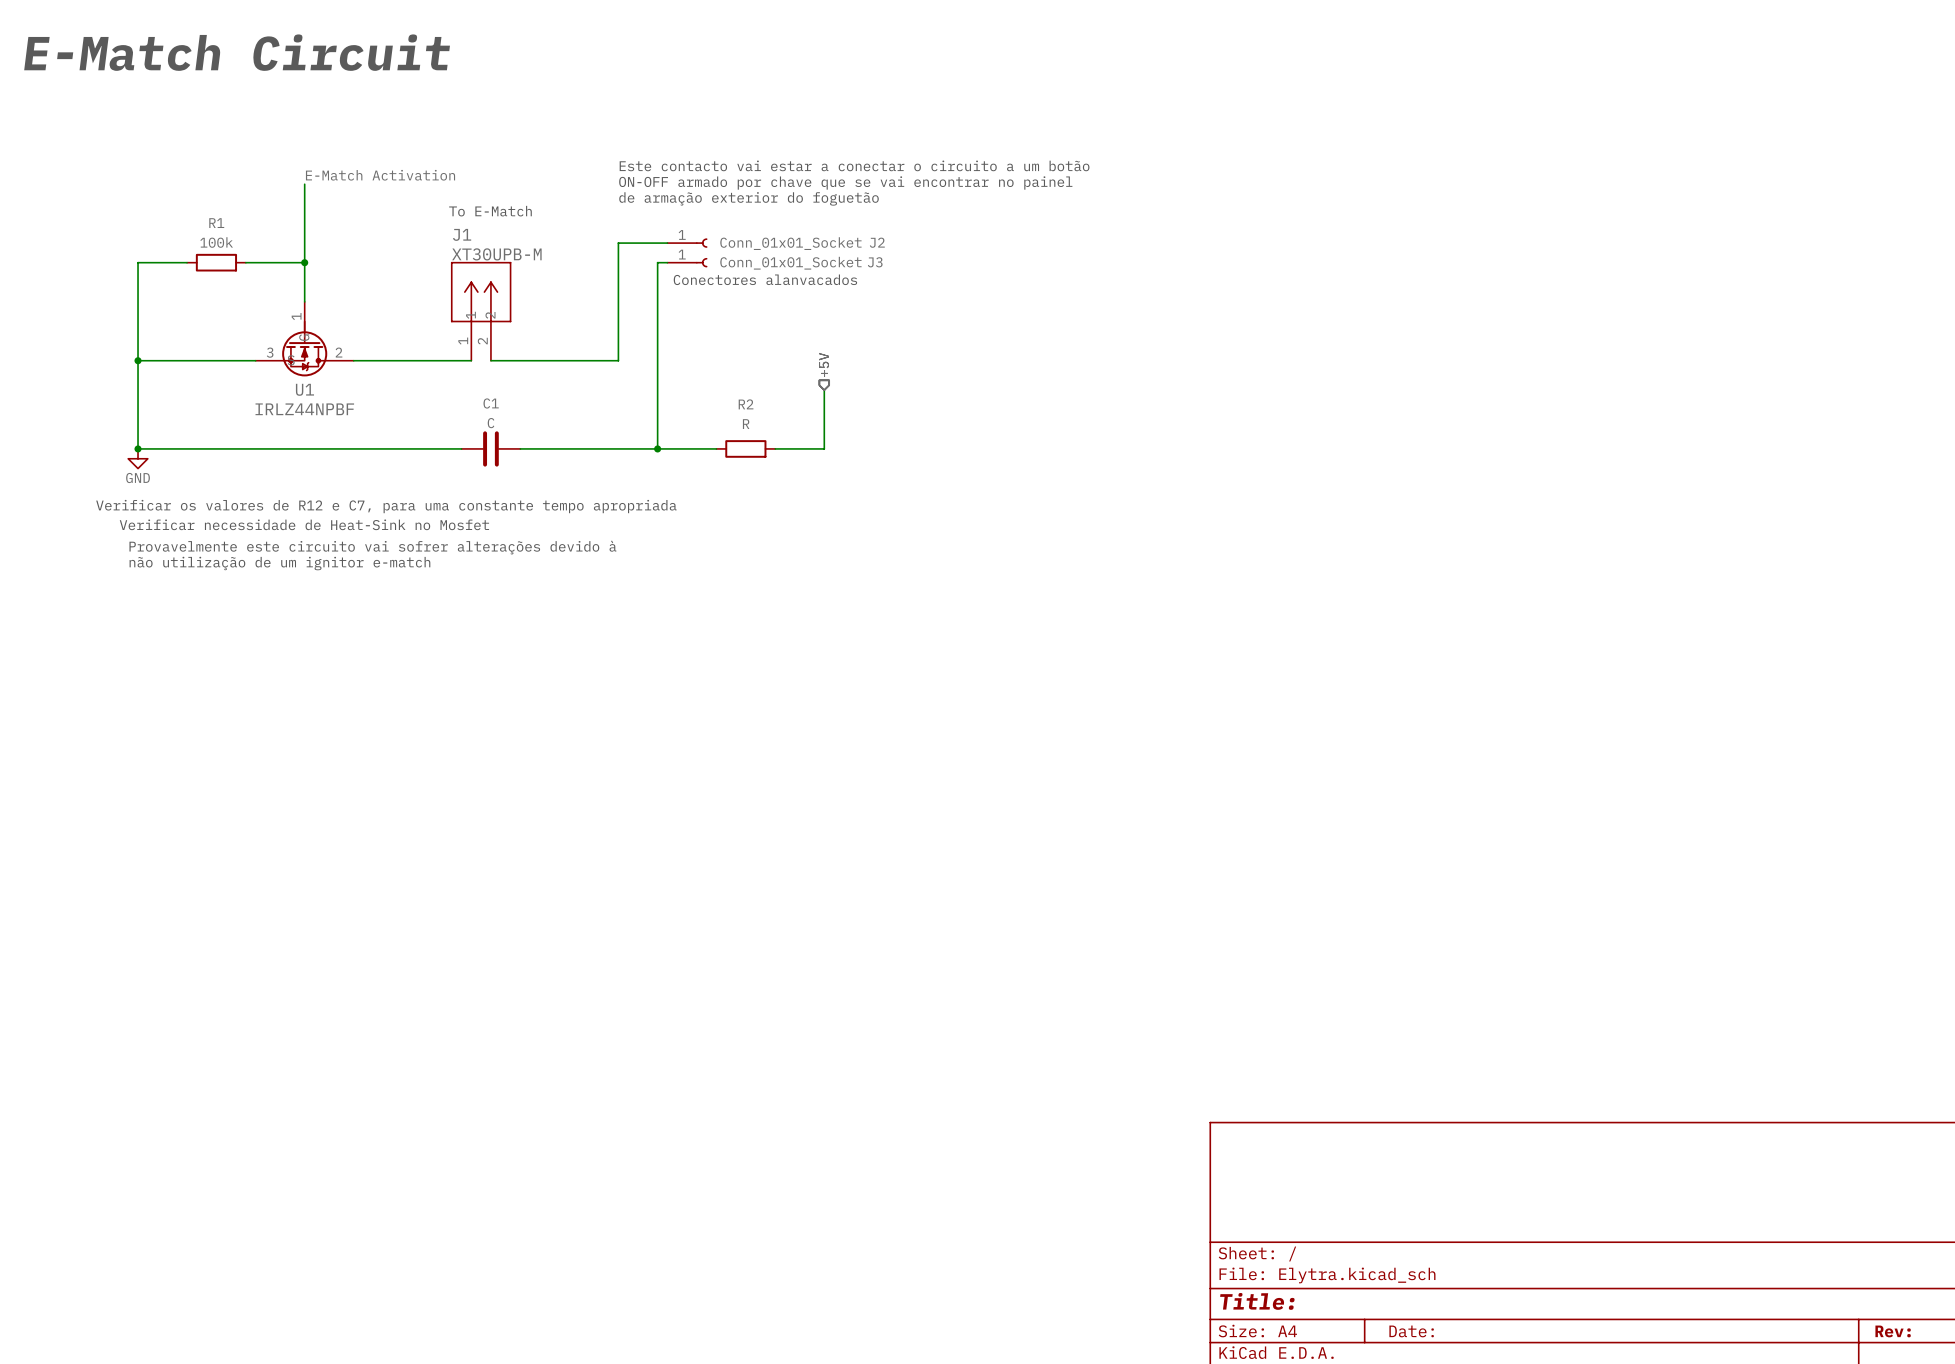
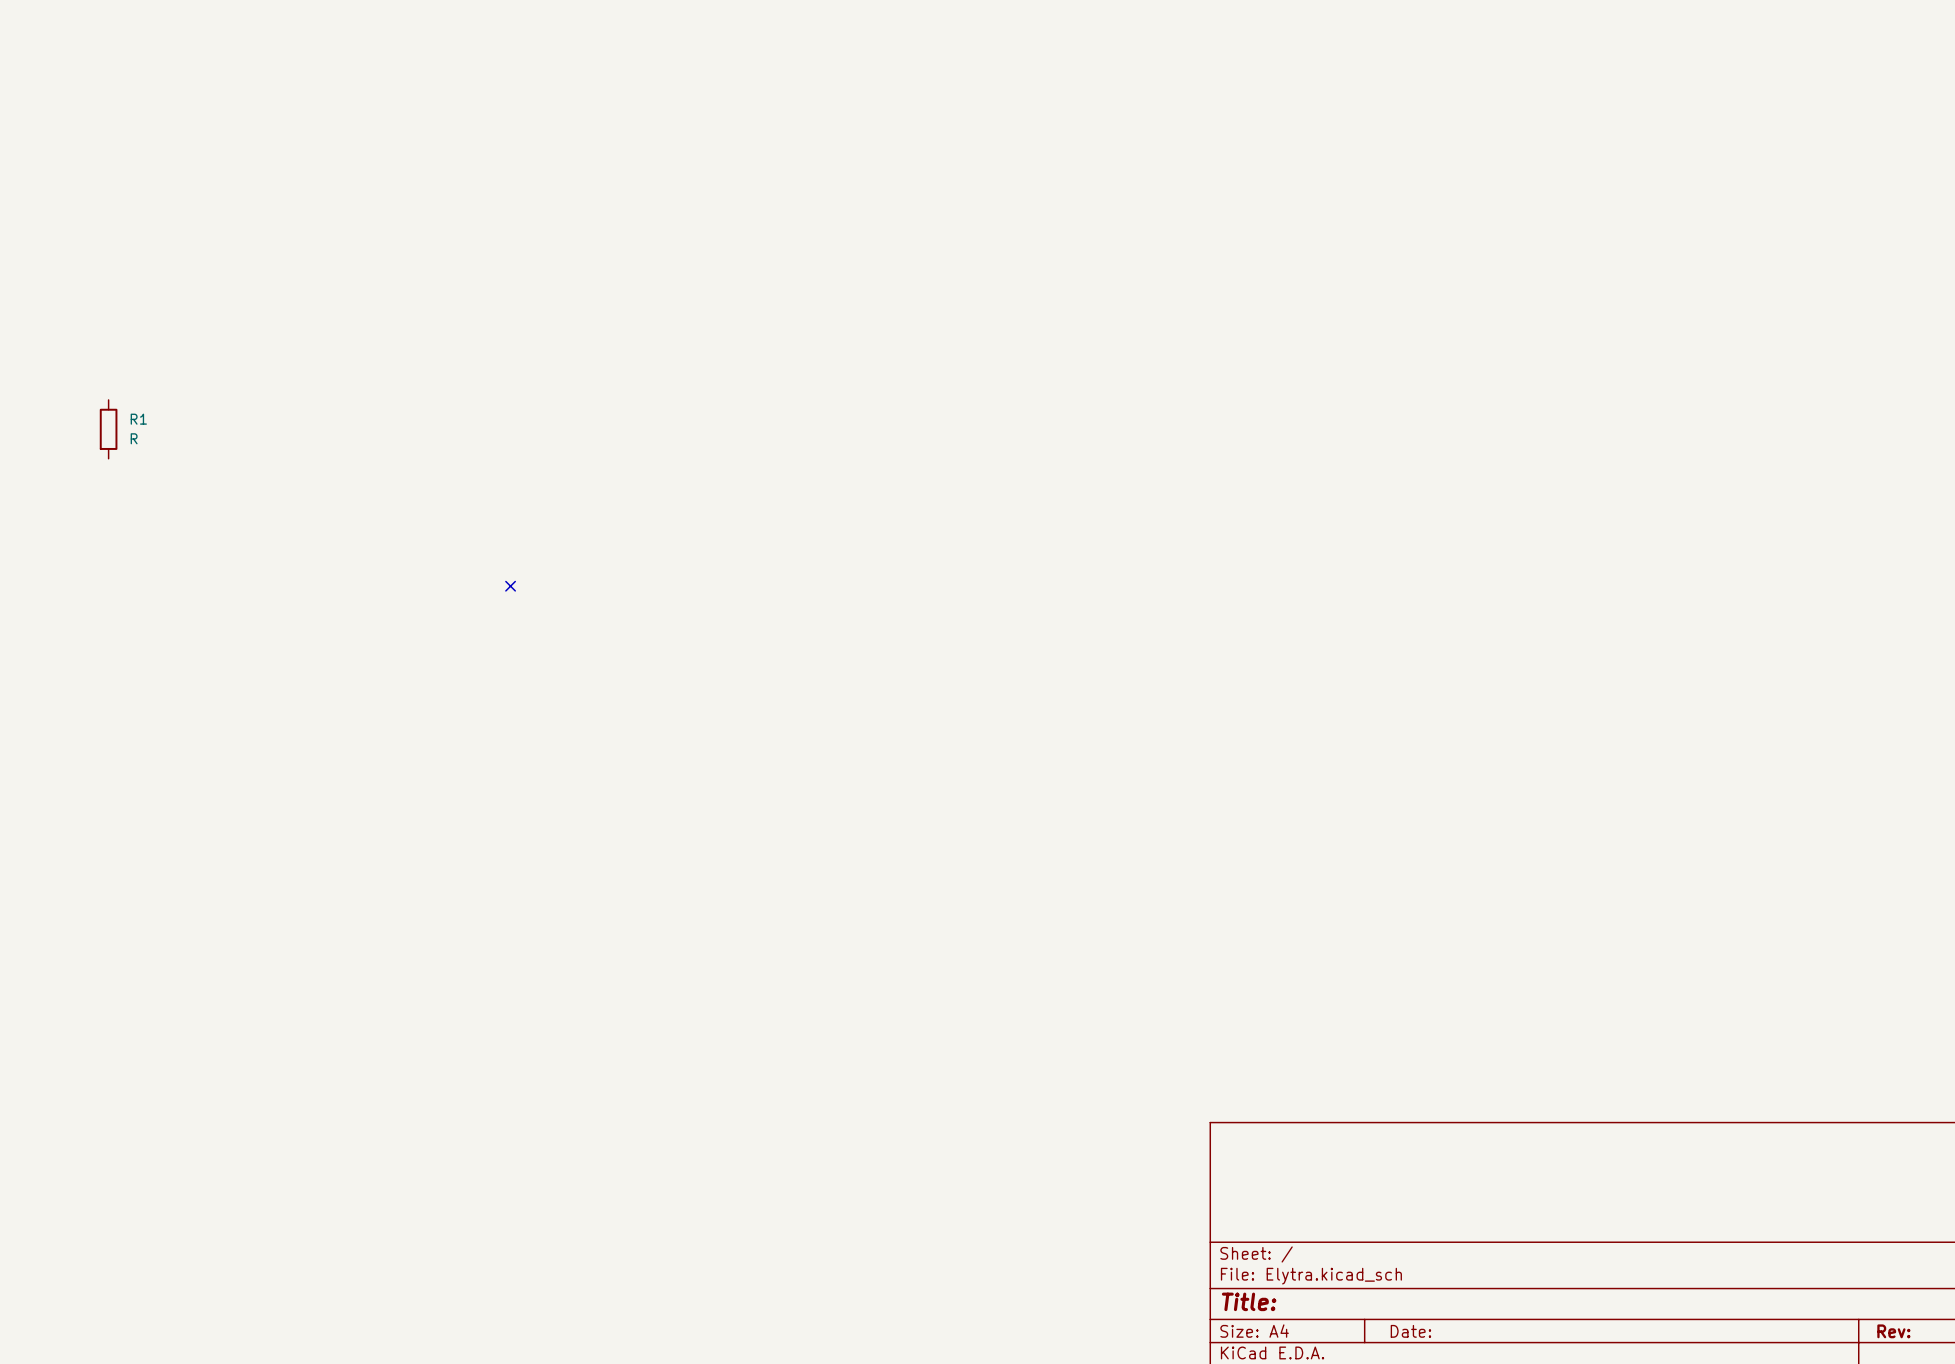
text: E-Match Circuit (237, 52) -> none
text: Este contacto vai estar a conectar o circuito a um botão (854, 165) -> none
label: E-Match Activation (380, 175) -> none
text: ON-OFF armado por chave que se vai encontrar no painel (845, 183) -> none
wire: (304, 184) (304, 301) -> none
text: de armação exterior do foguetão (749, 198) -> none
text: To E-Match (490, 211) -> none
R1 value: 100k (216, 242) -> R (134, 438)
wire: (667, 243) (618, 243) (618, 360) (490, 360) -> none
J2: Conn_01x01_Socket (687, 243) -> none
wire: (187, 262) (138, 262) (138, 448) (461, 448) -> none
R1 rotation: 0° (216, 262) -> 90° clockwise (108, 429)
R1 position: (216, 262) -> (108, 429)
wire: (245, 262) (304, 262) -> none
junction: (304, 262) -> none
wire: (667, 262) (657, 262) (657, 448) -> none
J3: Conn_01x01_Socket (687, 262) -> none
text: Conectores alanvacados (765, 279) -> none
J1: XT30UPB-M (481, 311) -> none
U1: IRLZ44NPBF (304, 339) -> none
wire: (138, 360) (255, 360) -> none
junction: (138, 360) -> none
wire: (353, 360) (471, 360) -> none
hierarchical label: +5V (824, 364) -> none
wire: (824, 390) (824, 448) (775, 448) -> none
junction: (138, 448) -> none
C1: C (490, 448) -> none
wire: (520, 448) (716, 448) -> none
junction: (657, 448) -> none
R2: R (745, 448) -> none
power symbol: GND (138, 458) -> none
text: Verificar os valores de R12 e C7, para uma constante tempo apropriada (386, 506) -> none
text: Verificar necessidade de Heat-Sink no Mosfet (304, 524) -> none
text: Provavelmente este circuito vai sofrer alterações devido à (372, 547) -> none
text: não utilização de um ignitor e-match (279, 563) -> none
no-connect mark: none -> (510, 586)

